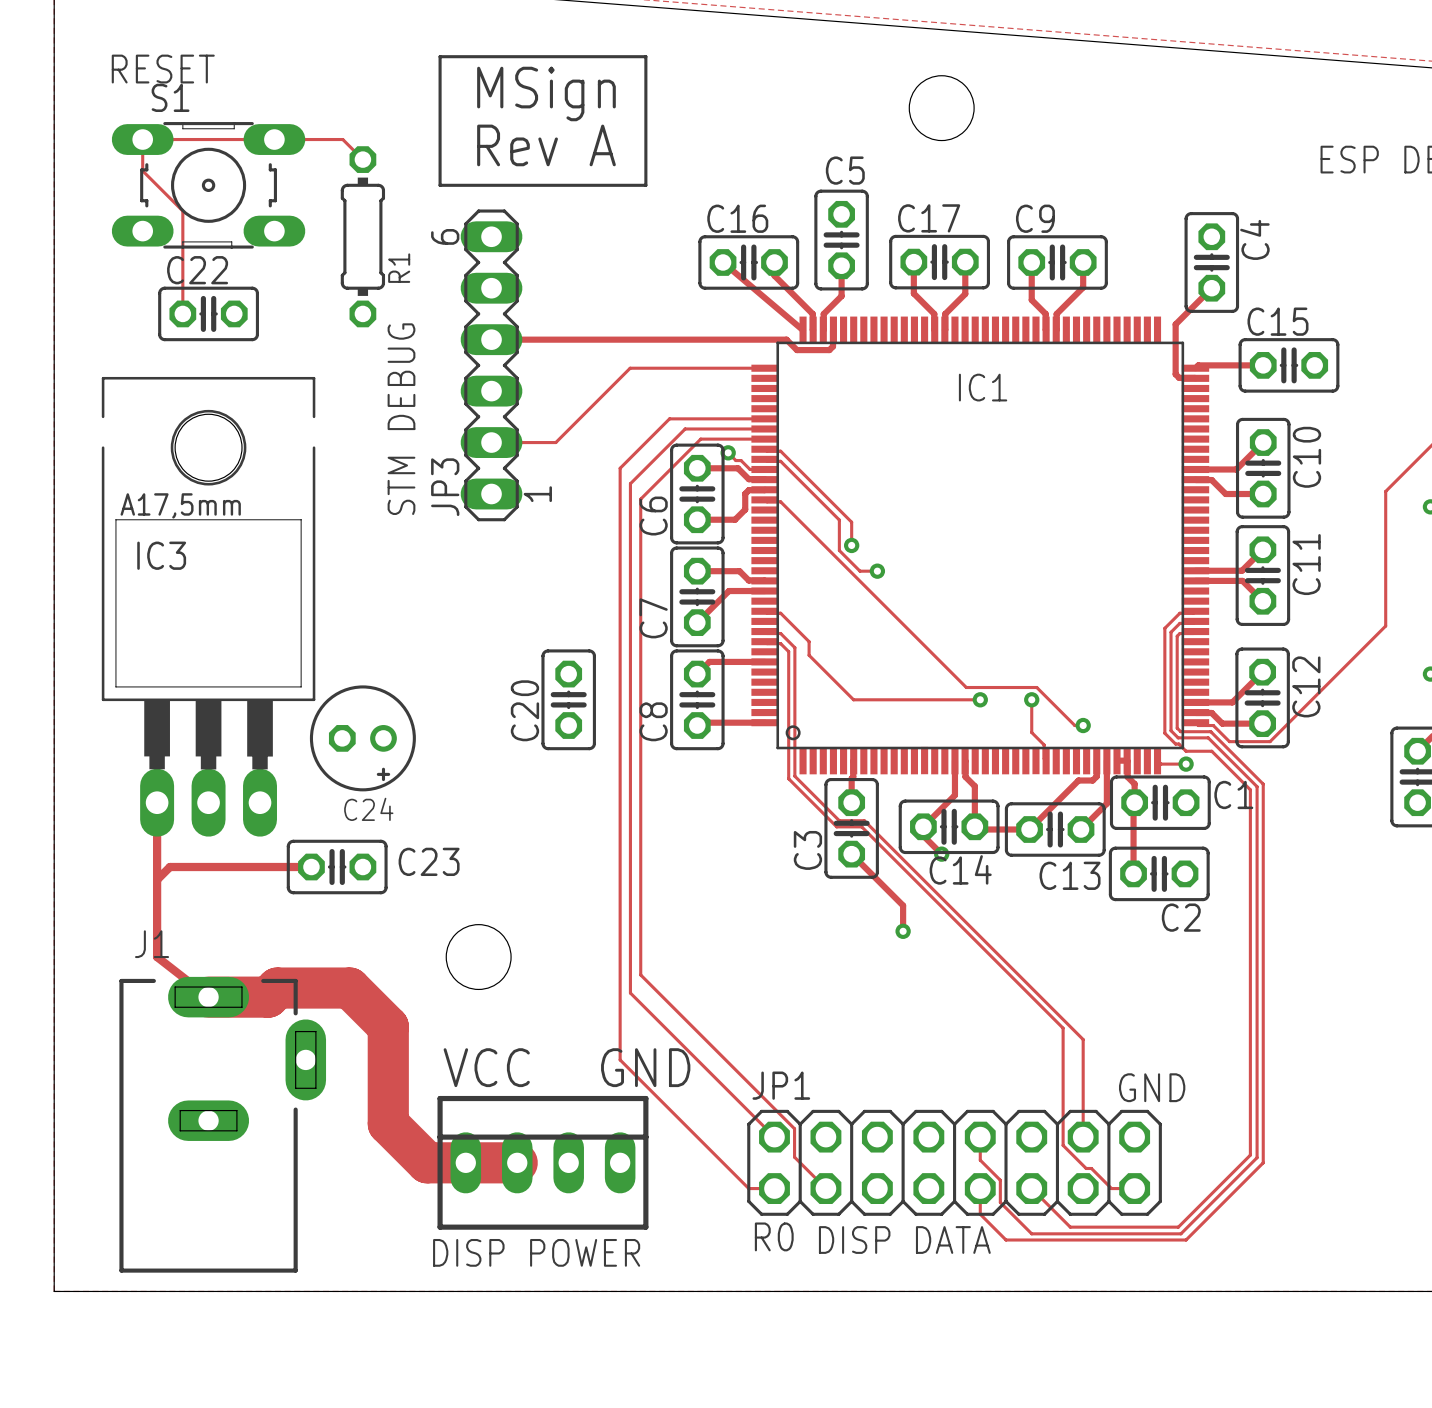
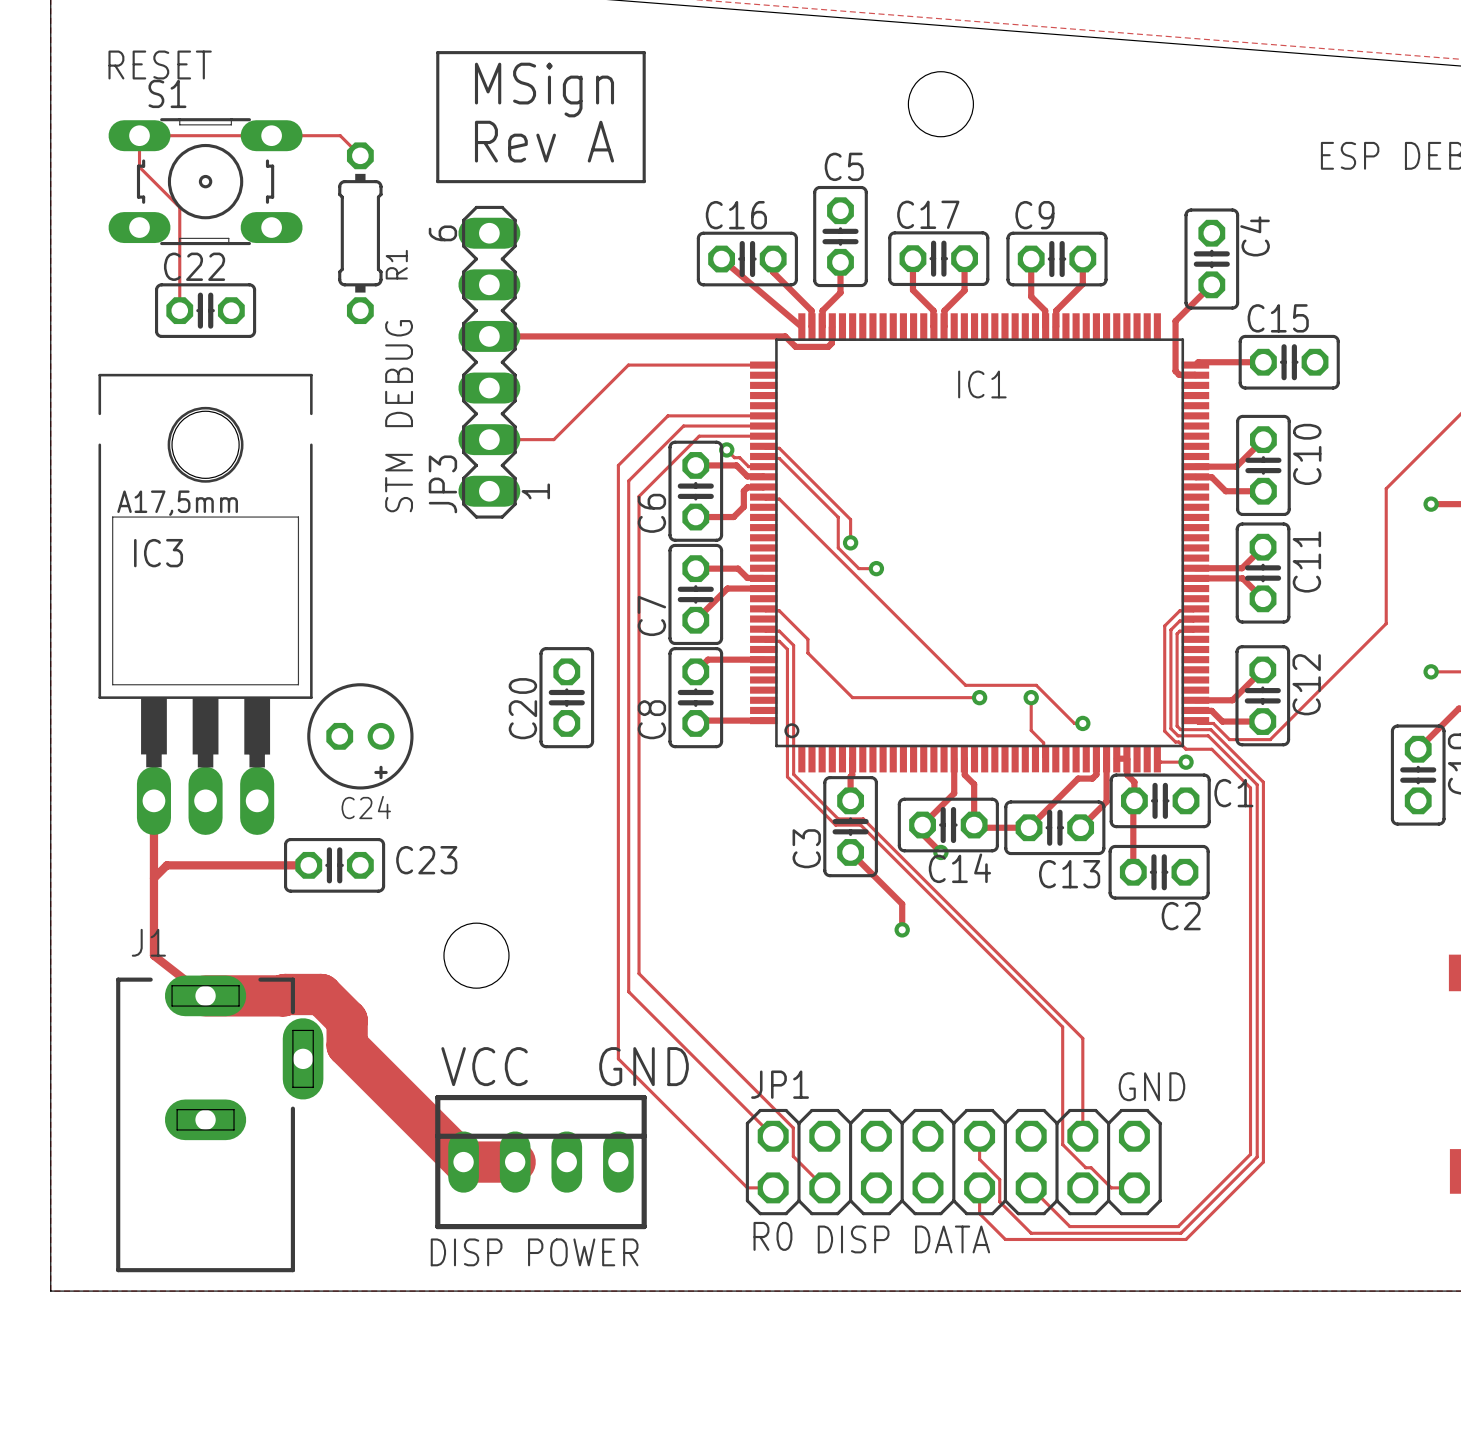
track: (268, 997) (277, 988) (349, 988) (388, 1026) (388, 1123) (427, 1162) (465, 1162) -> (265, 995) (321, 994) (347, 1020) (347, 1045) (463, 1162)

